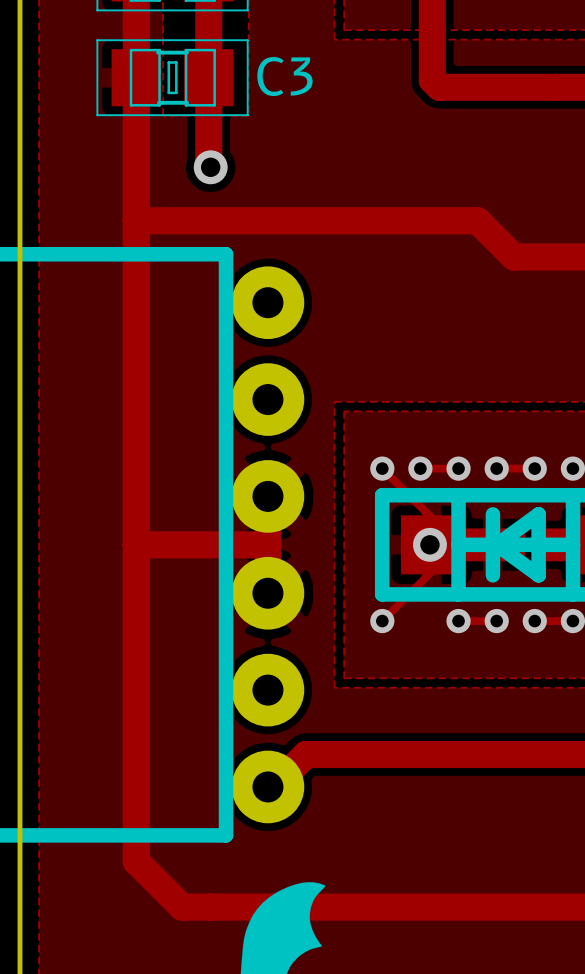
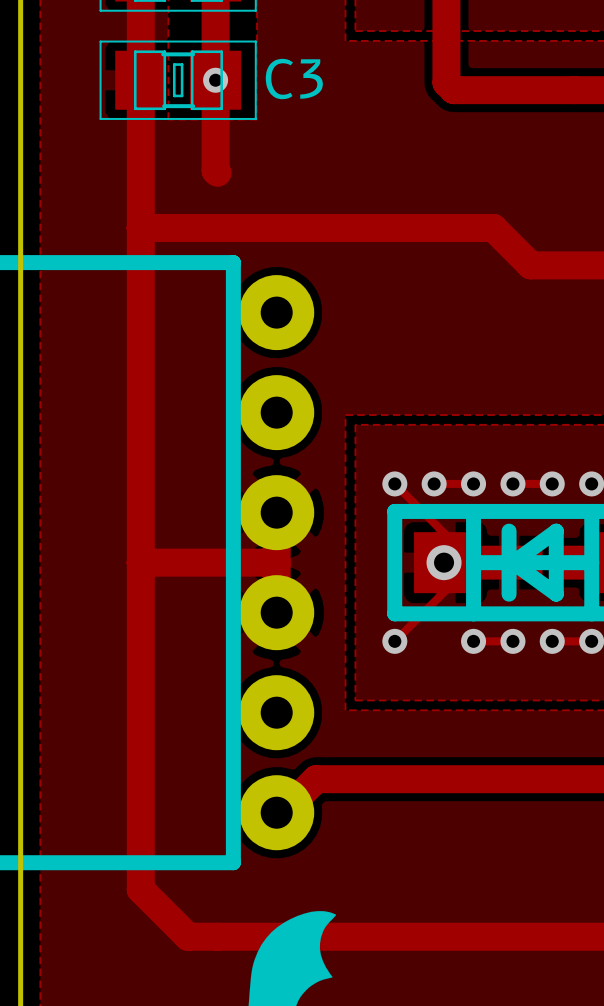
via: none -> (215, 80)
via: (210, 167) -> none

